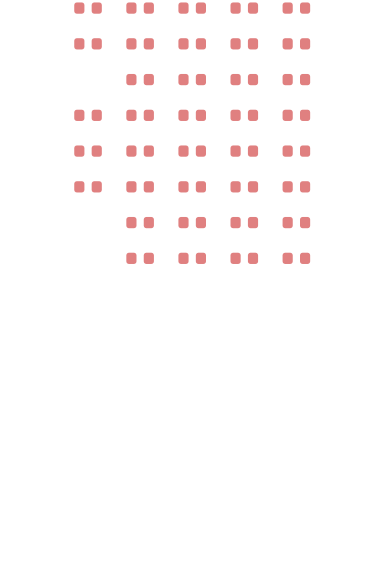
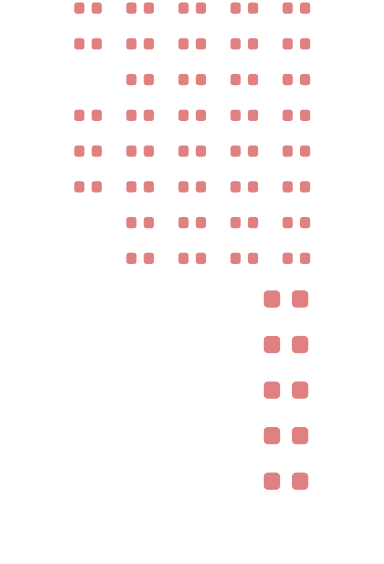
part: none -> (286, 298)
part: none -> (286, 344)
part: none -> (286, 390)
part: none -> (286, 435)
part: none -> (286, 481)

